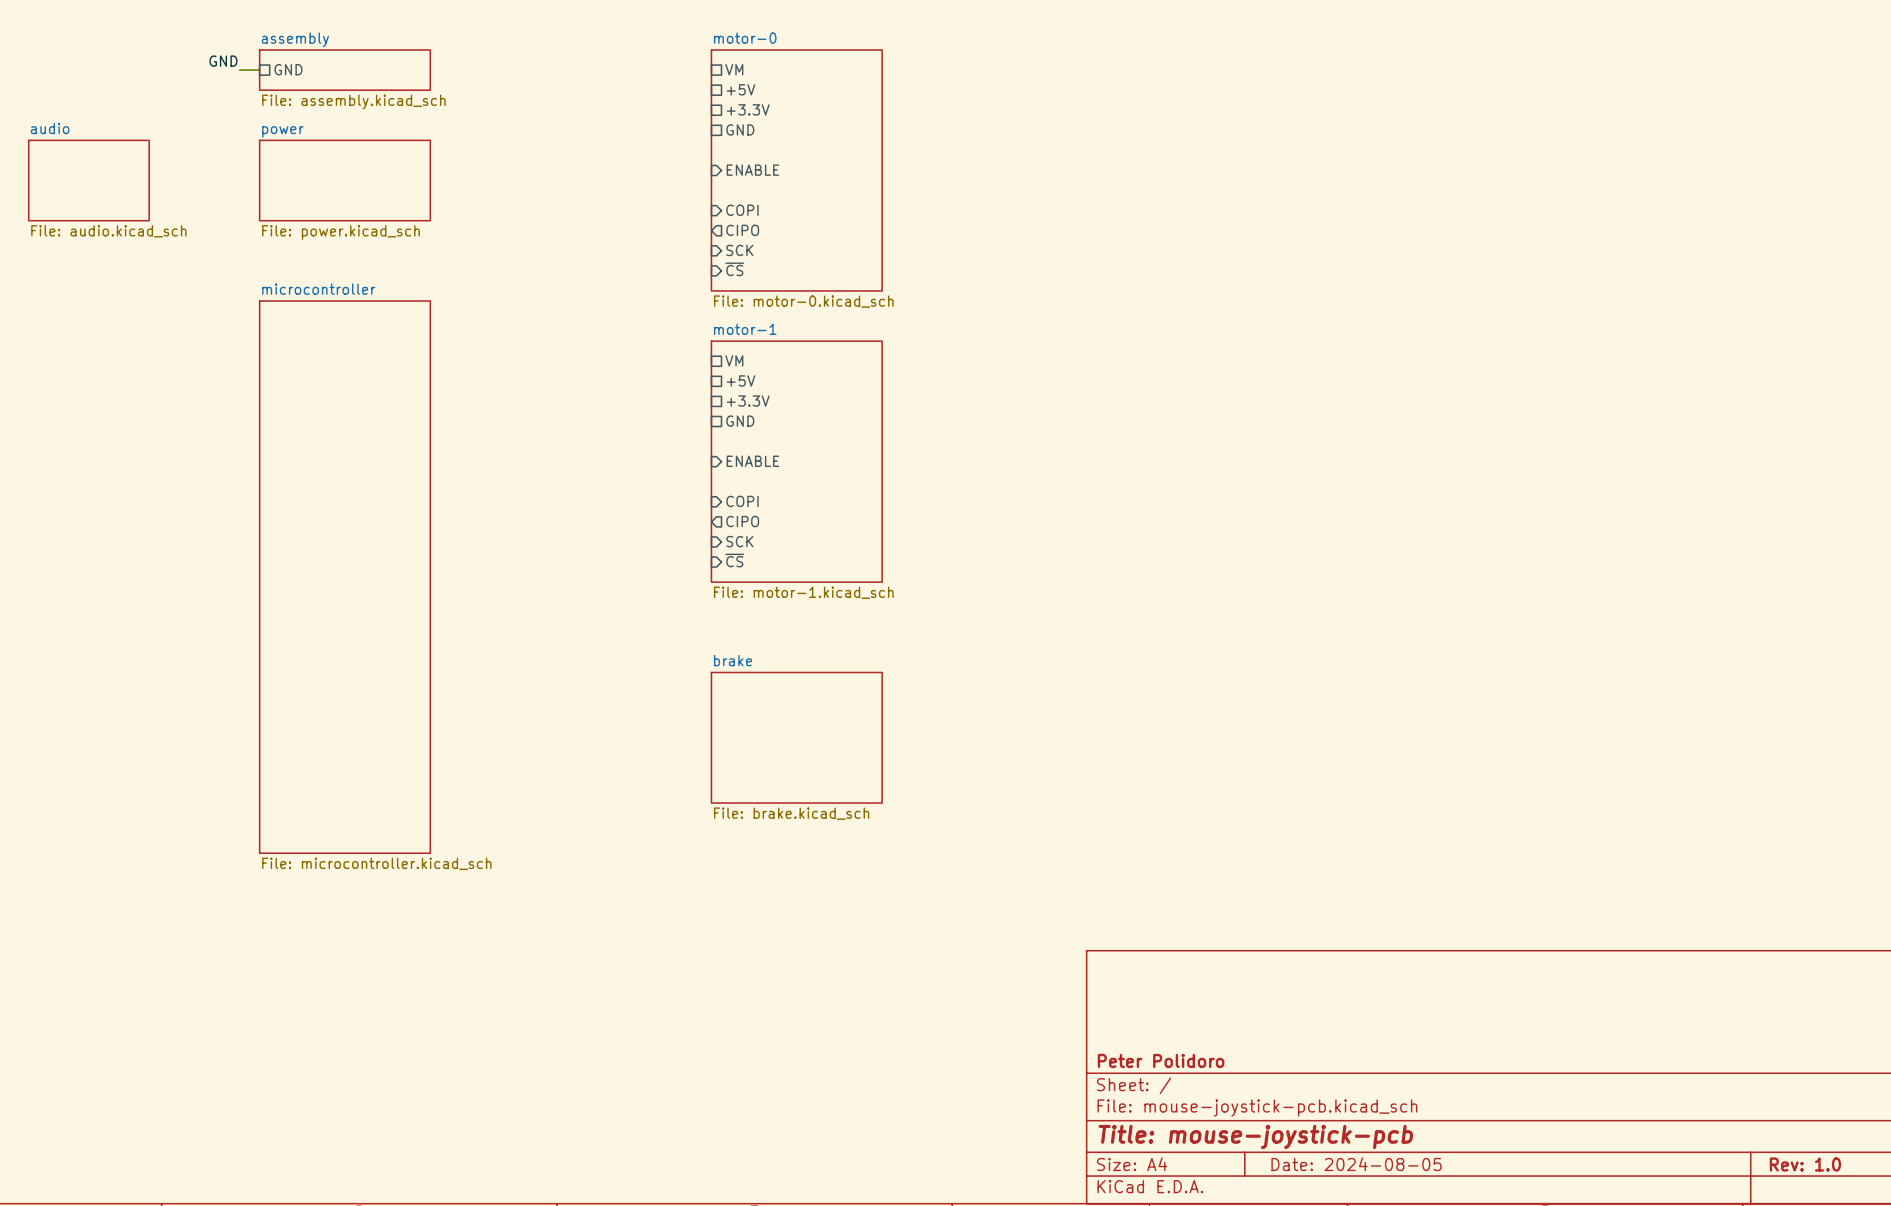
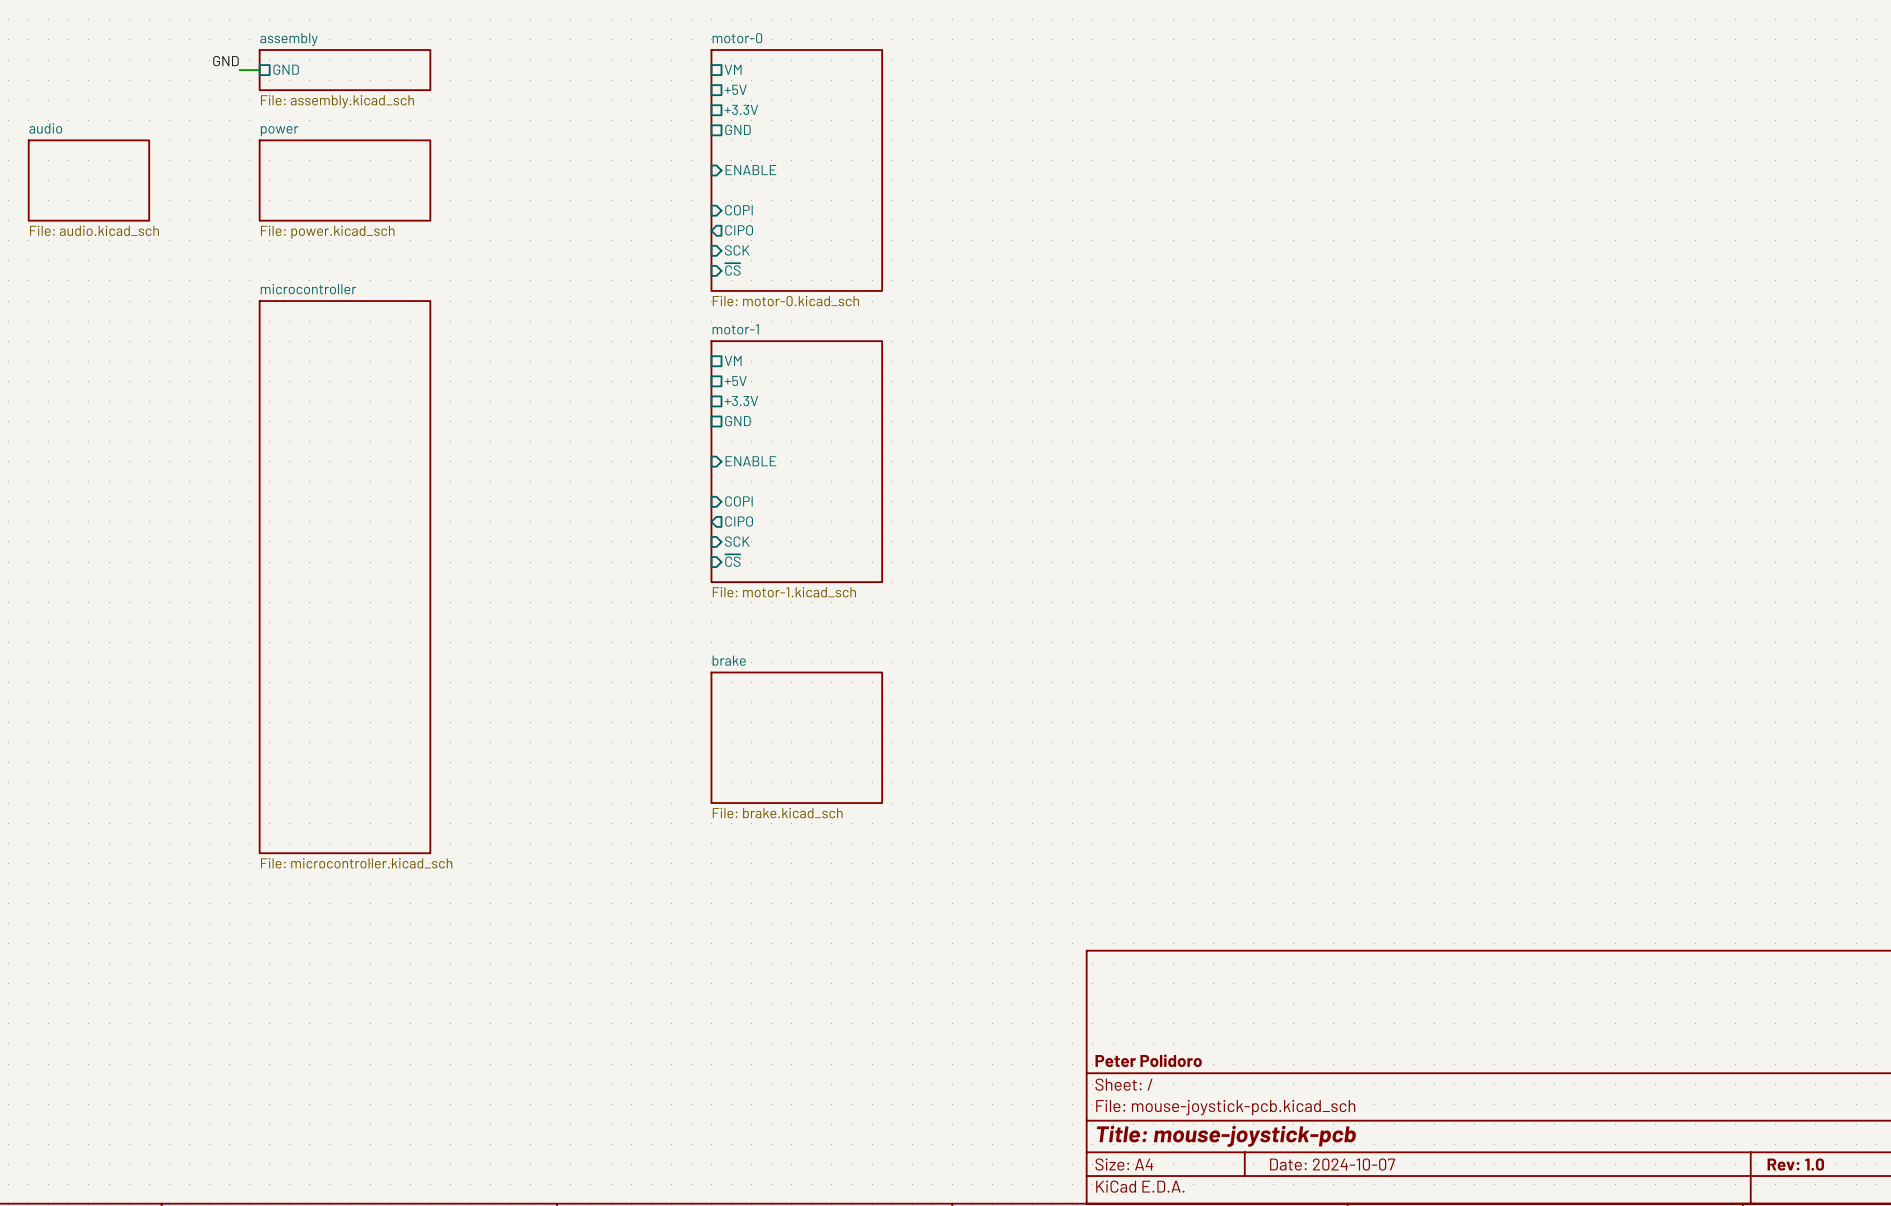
title block: Date: 2024-08-05 (1356, 1164) -> Date: 2024-10-07 (1332, 1164)

